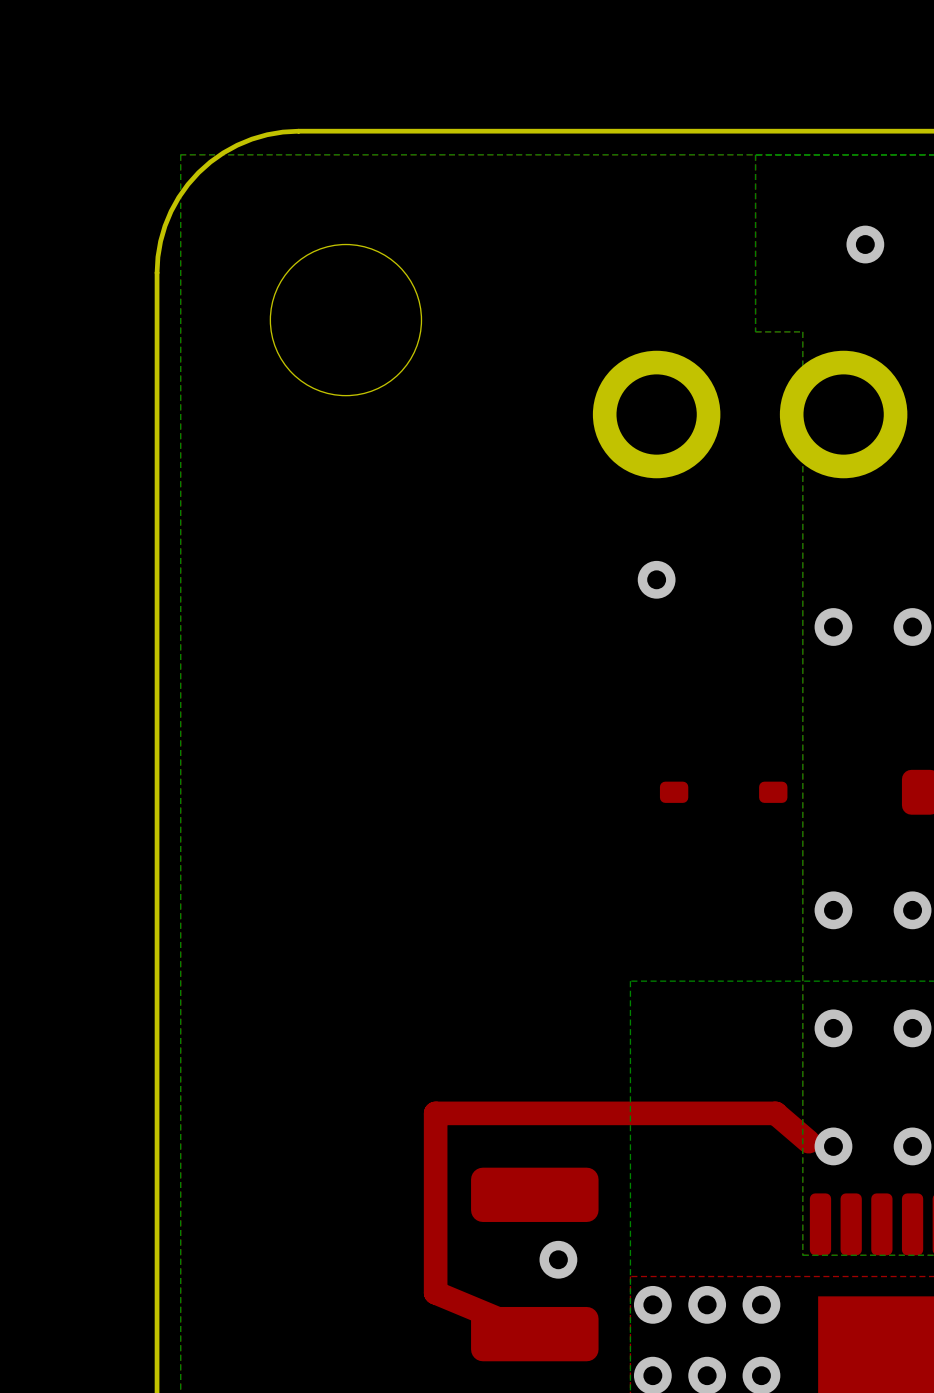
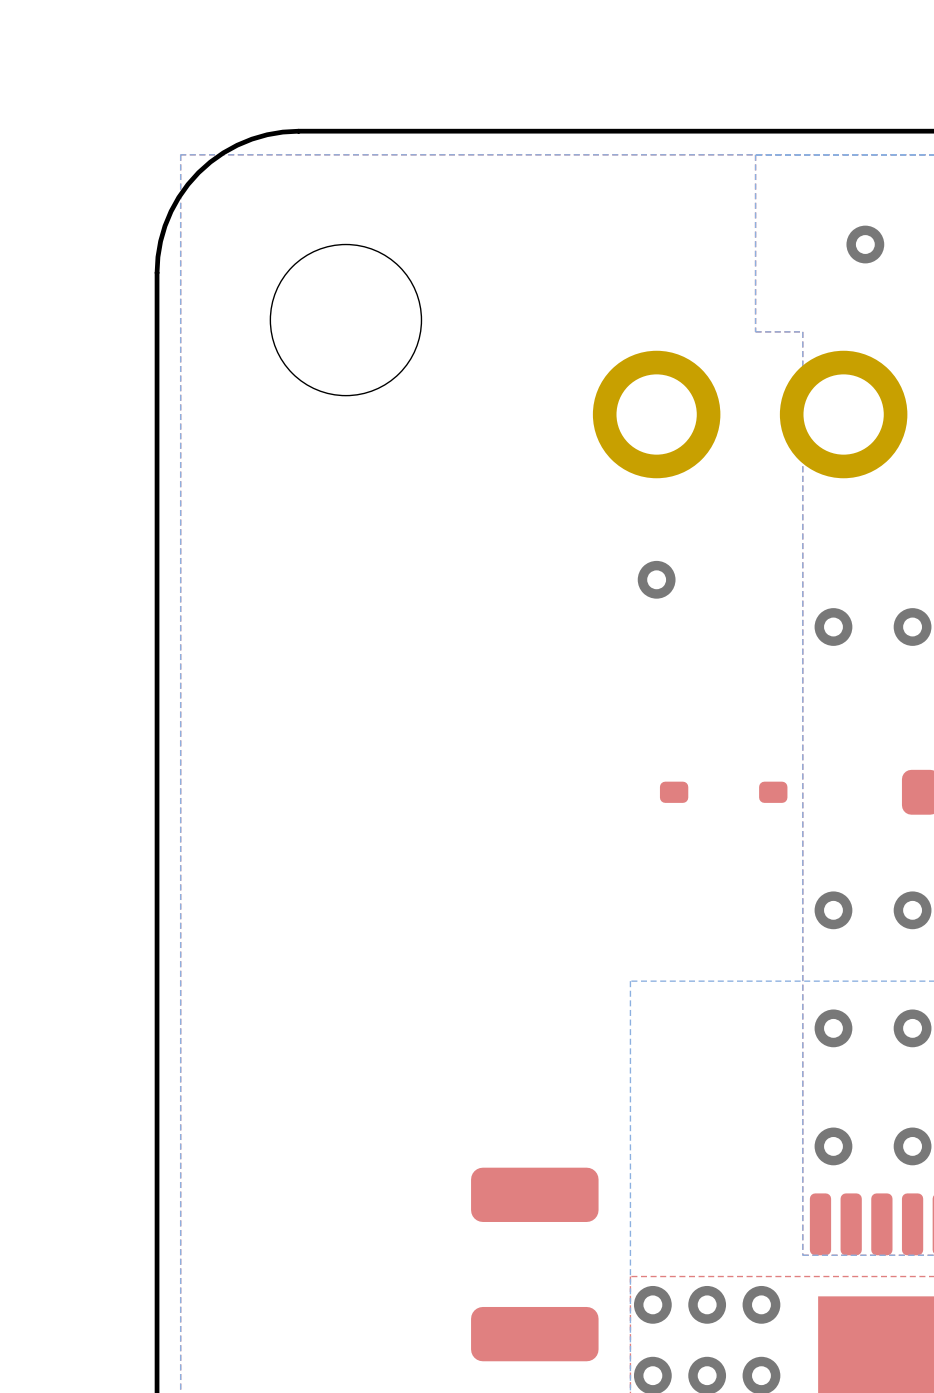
top track: (808, 1141) (775, 1113) (435, 1113) (435, 1292) (534, 1334) -> none
via: (558, 1259) -> none

